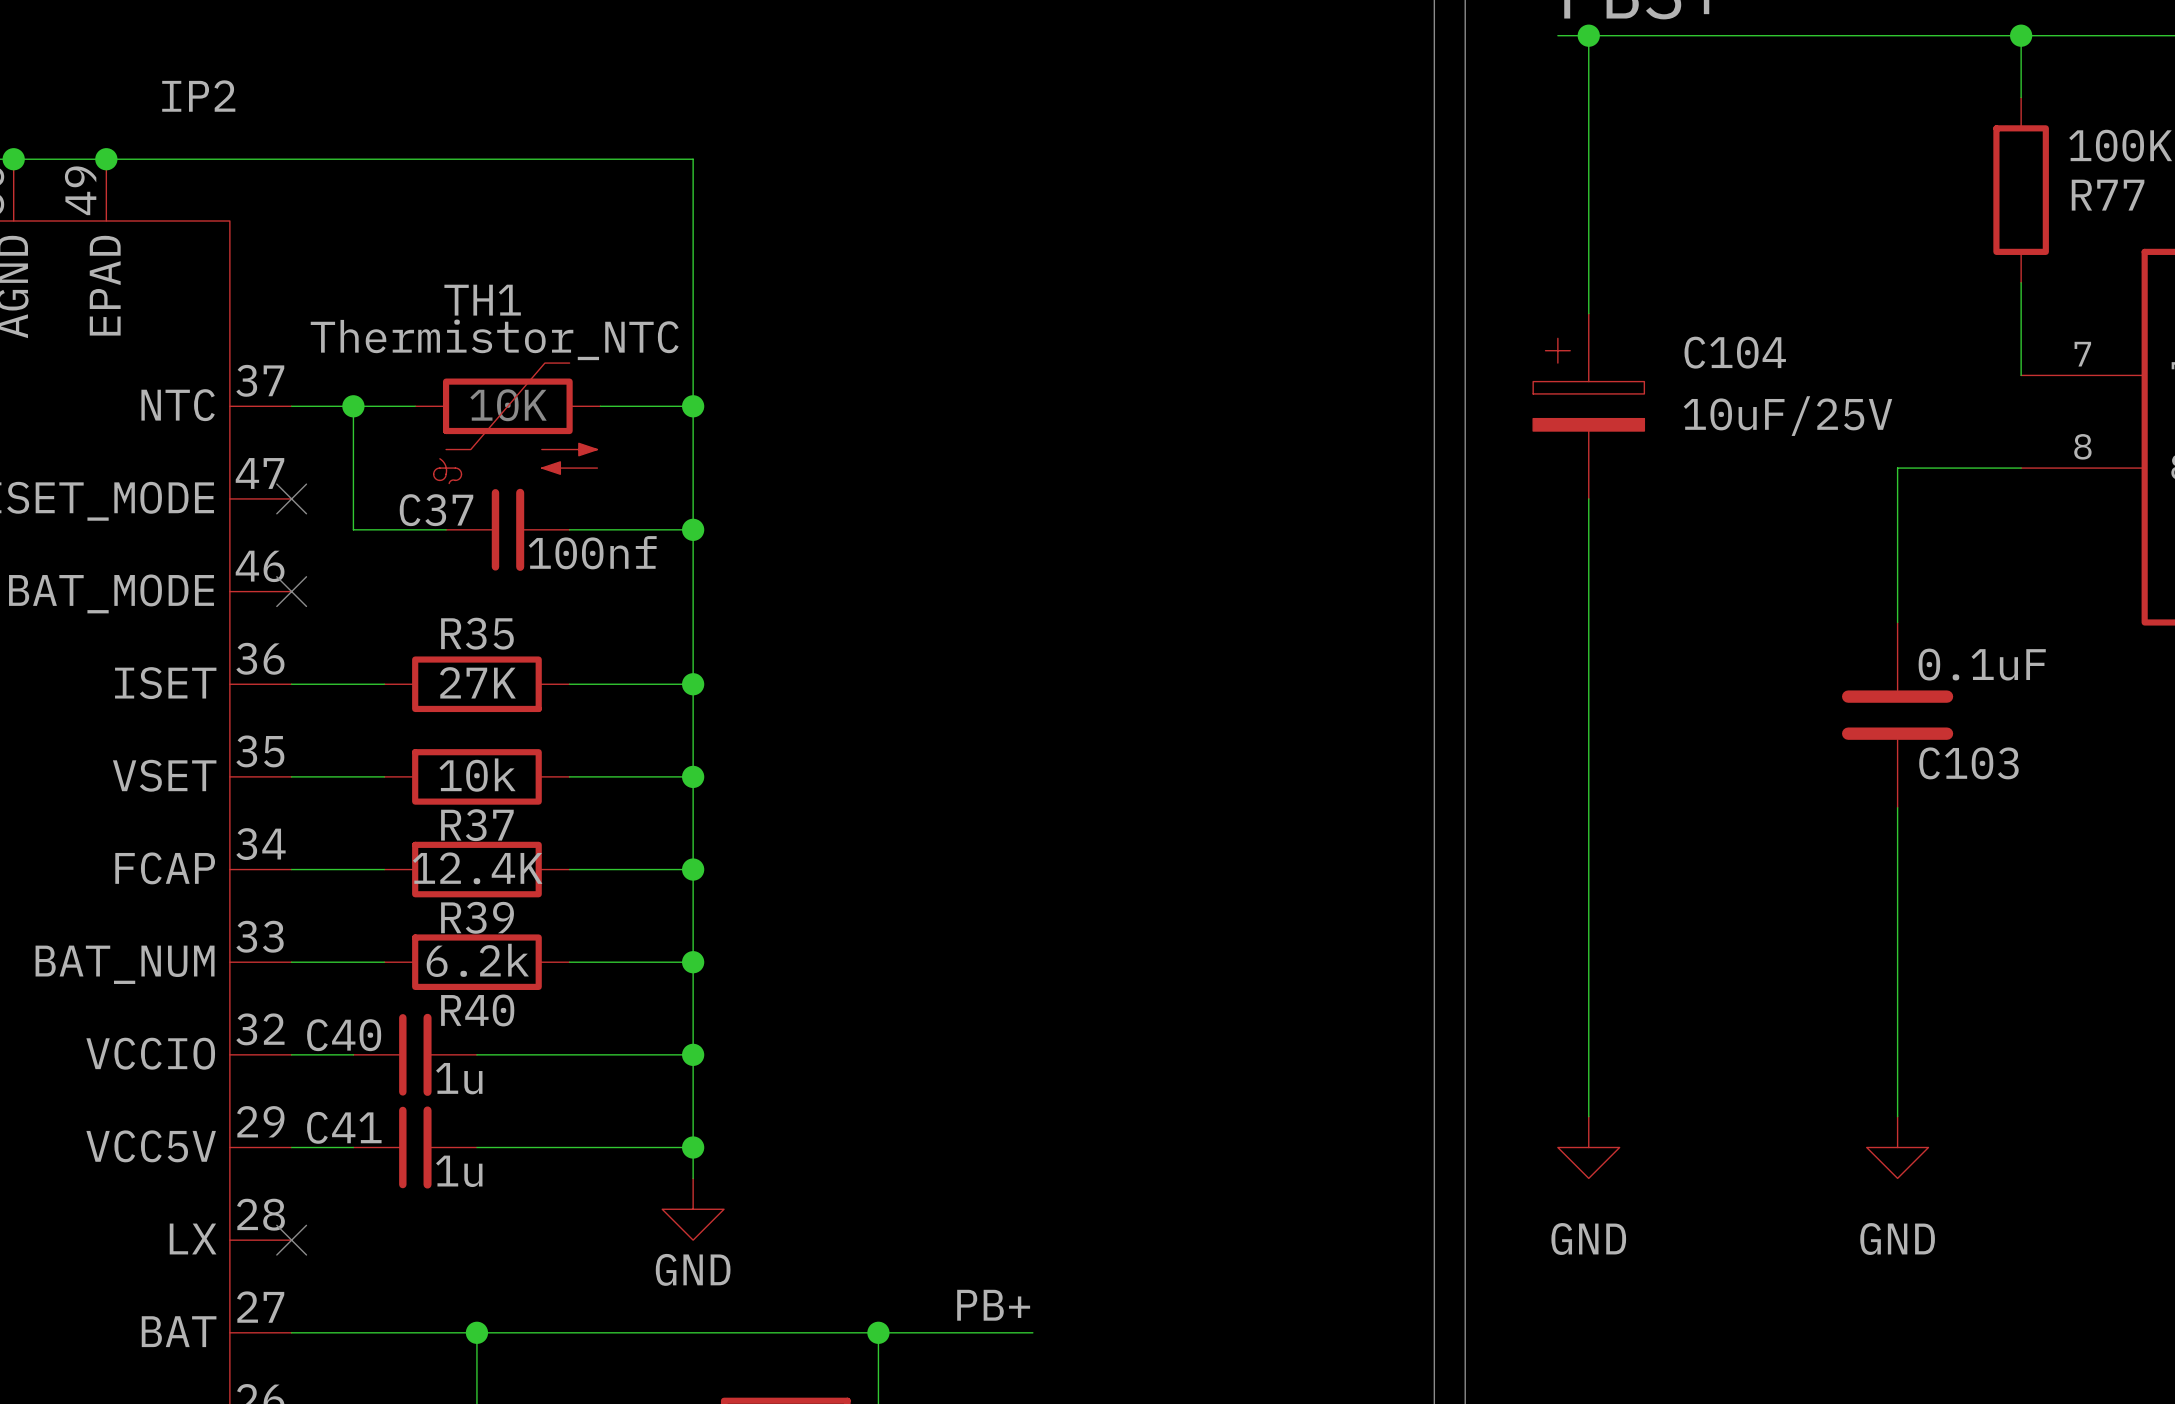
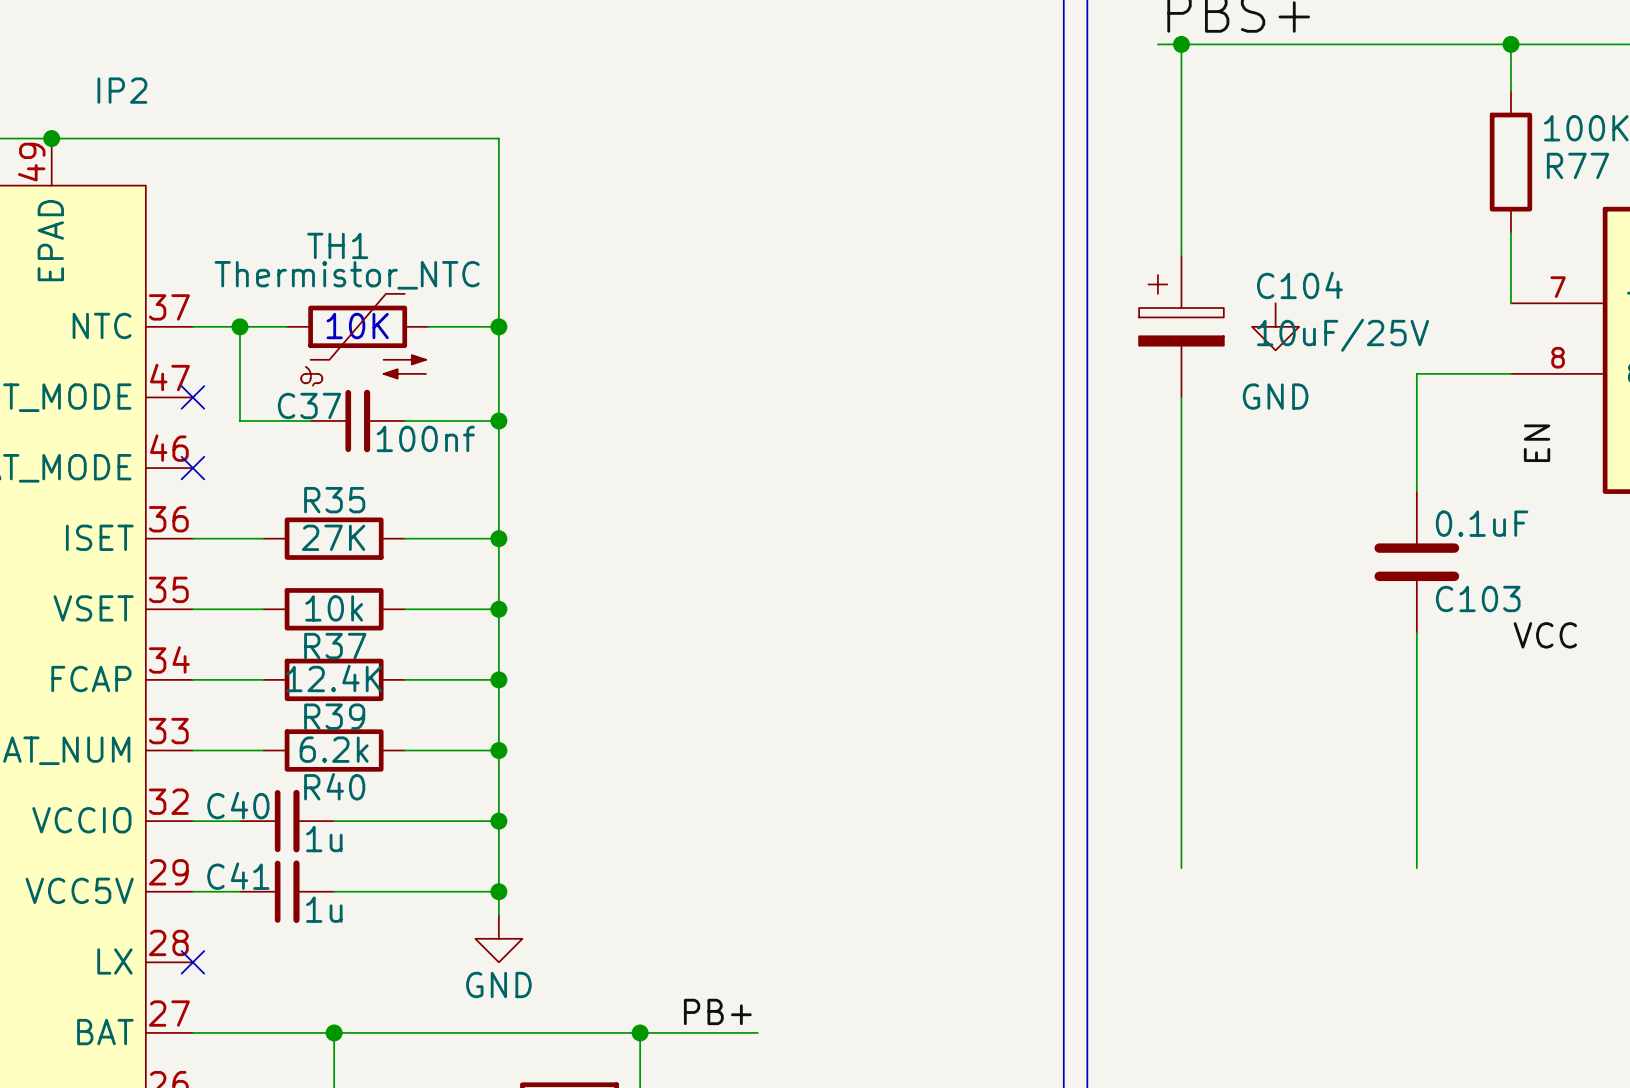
power symbol: none -> GND (1275, 326)
label: none -> EN (1537, 443)
label: none -> VCC (1545, 635)
power symbol: GND (1588, 1147) -> none
power symbol: GND (1897, 1147) -> none

